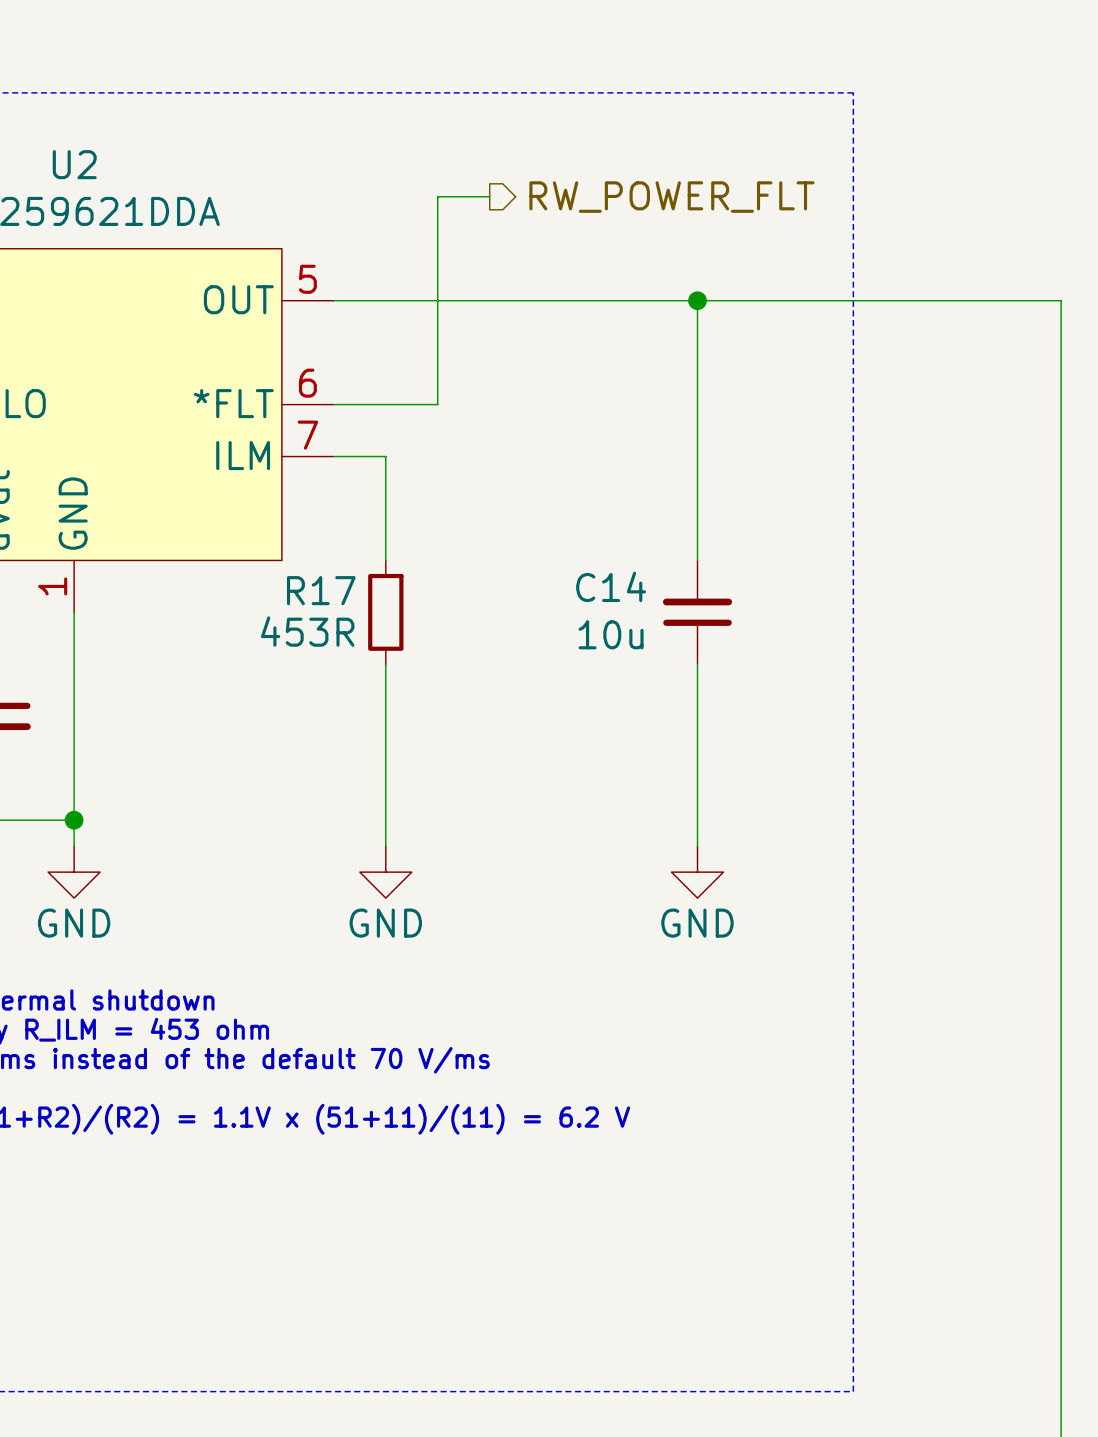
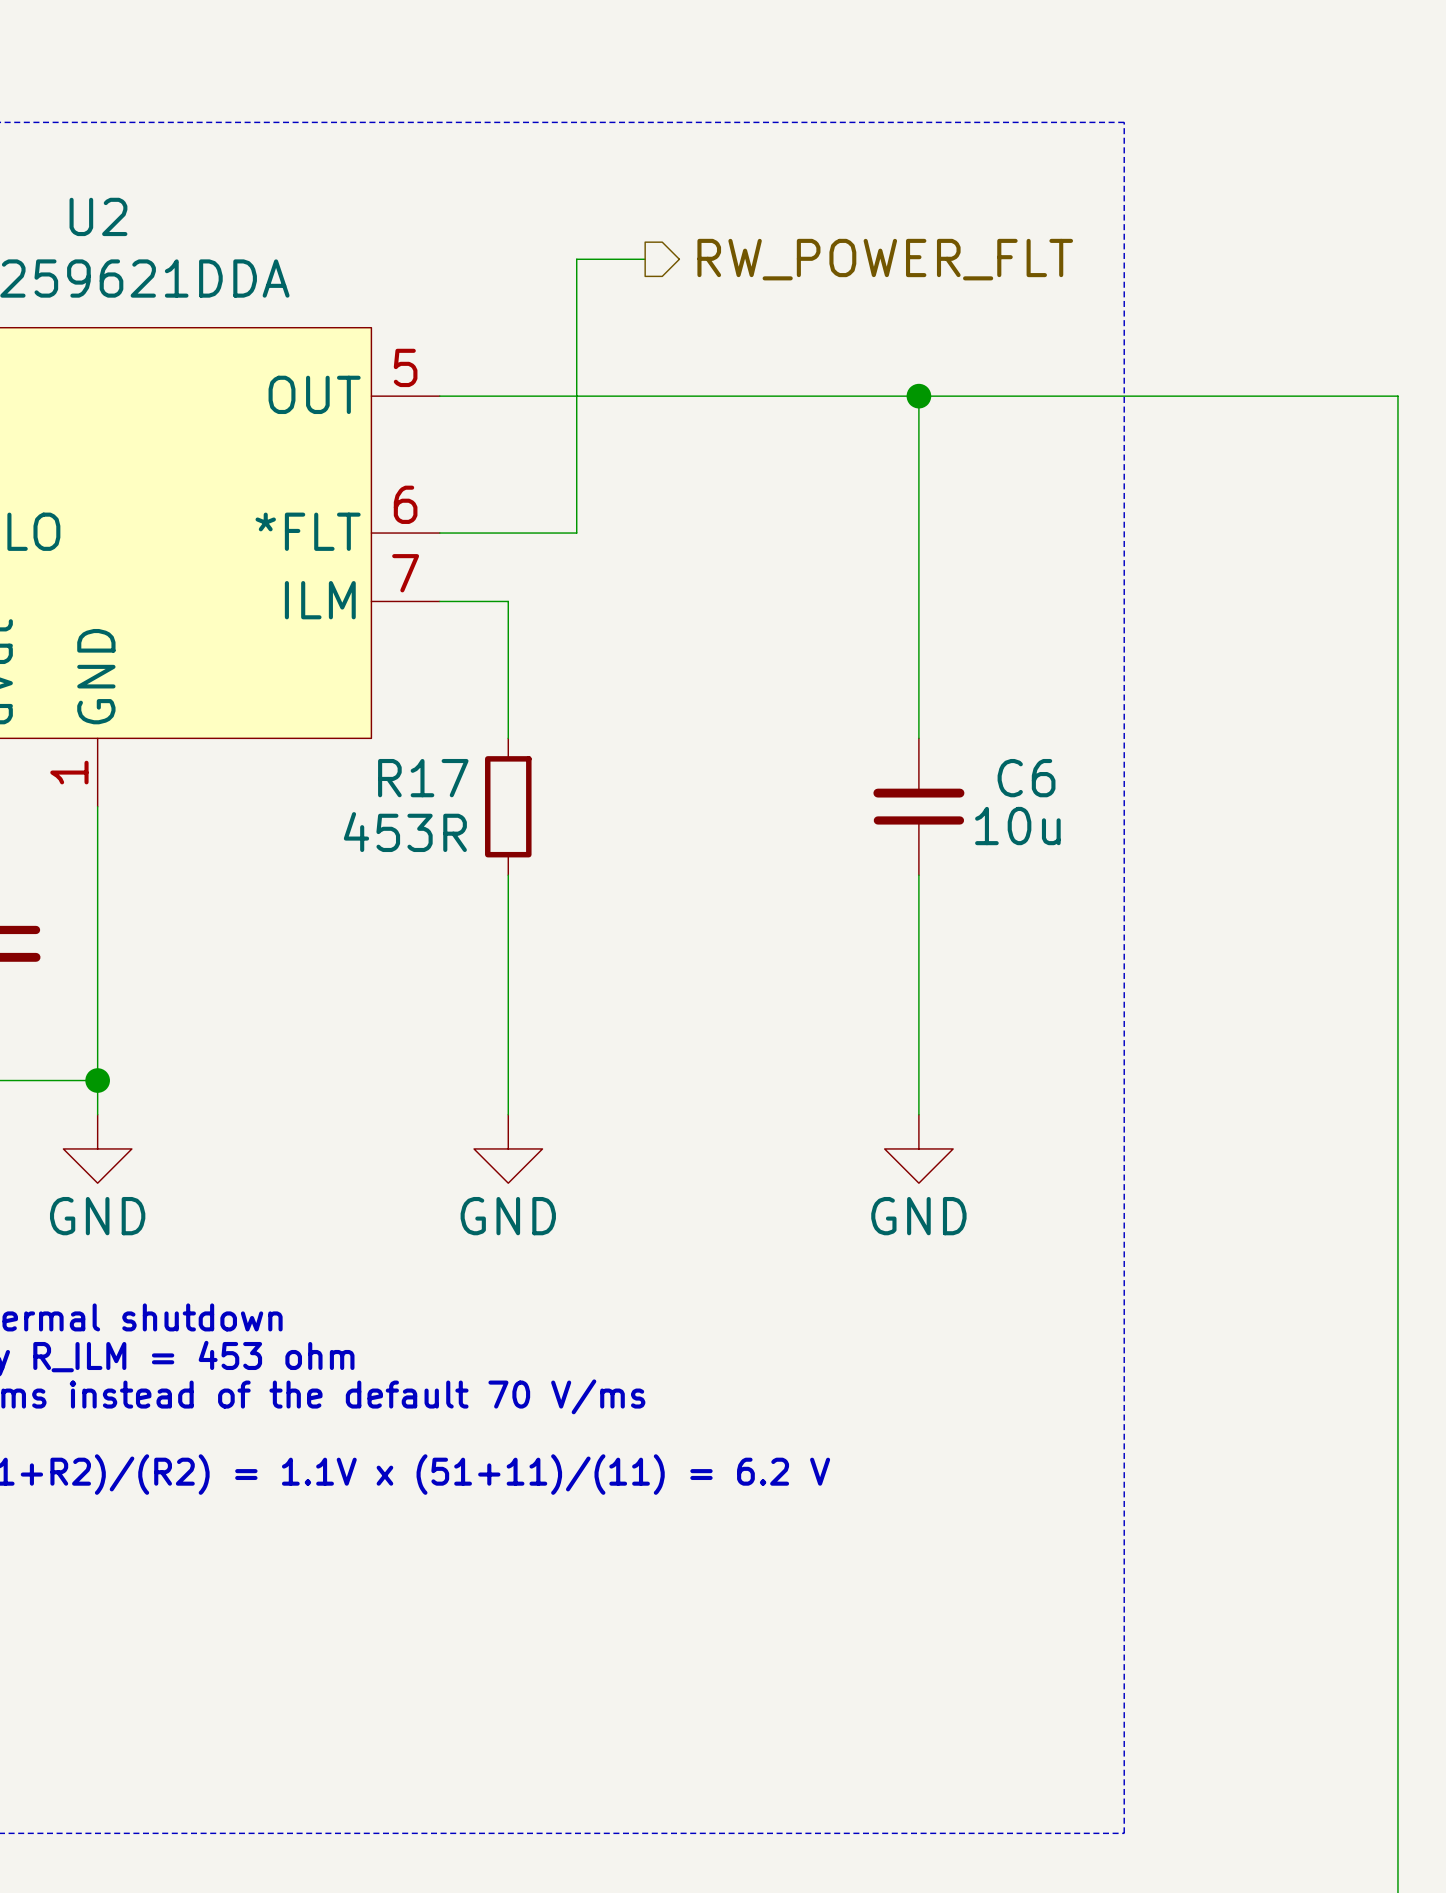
C14 name: C14 (611, 586) -> C6 (1026, 778)
C14 value position: 10u (611, 634) -> 10u (1017, 826)

